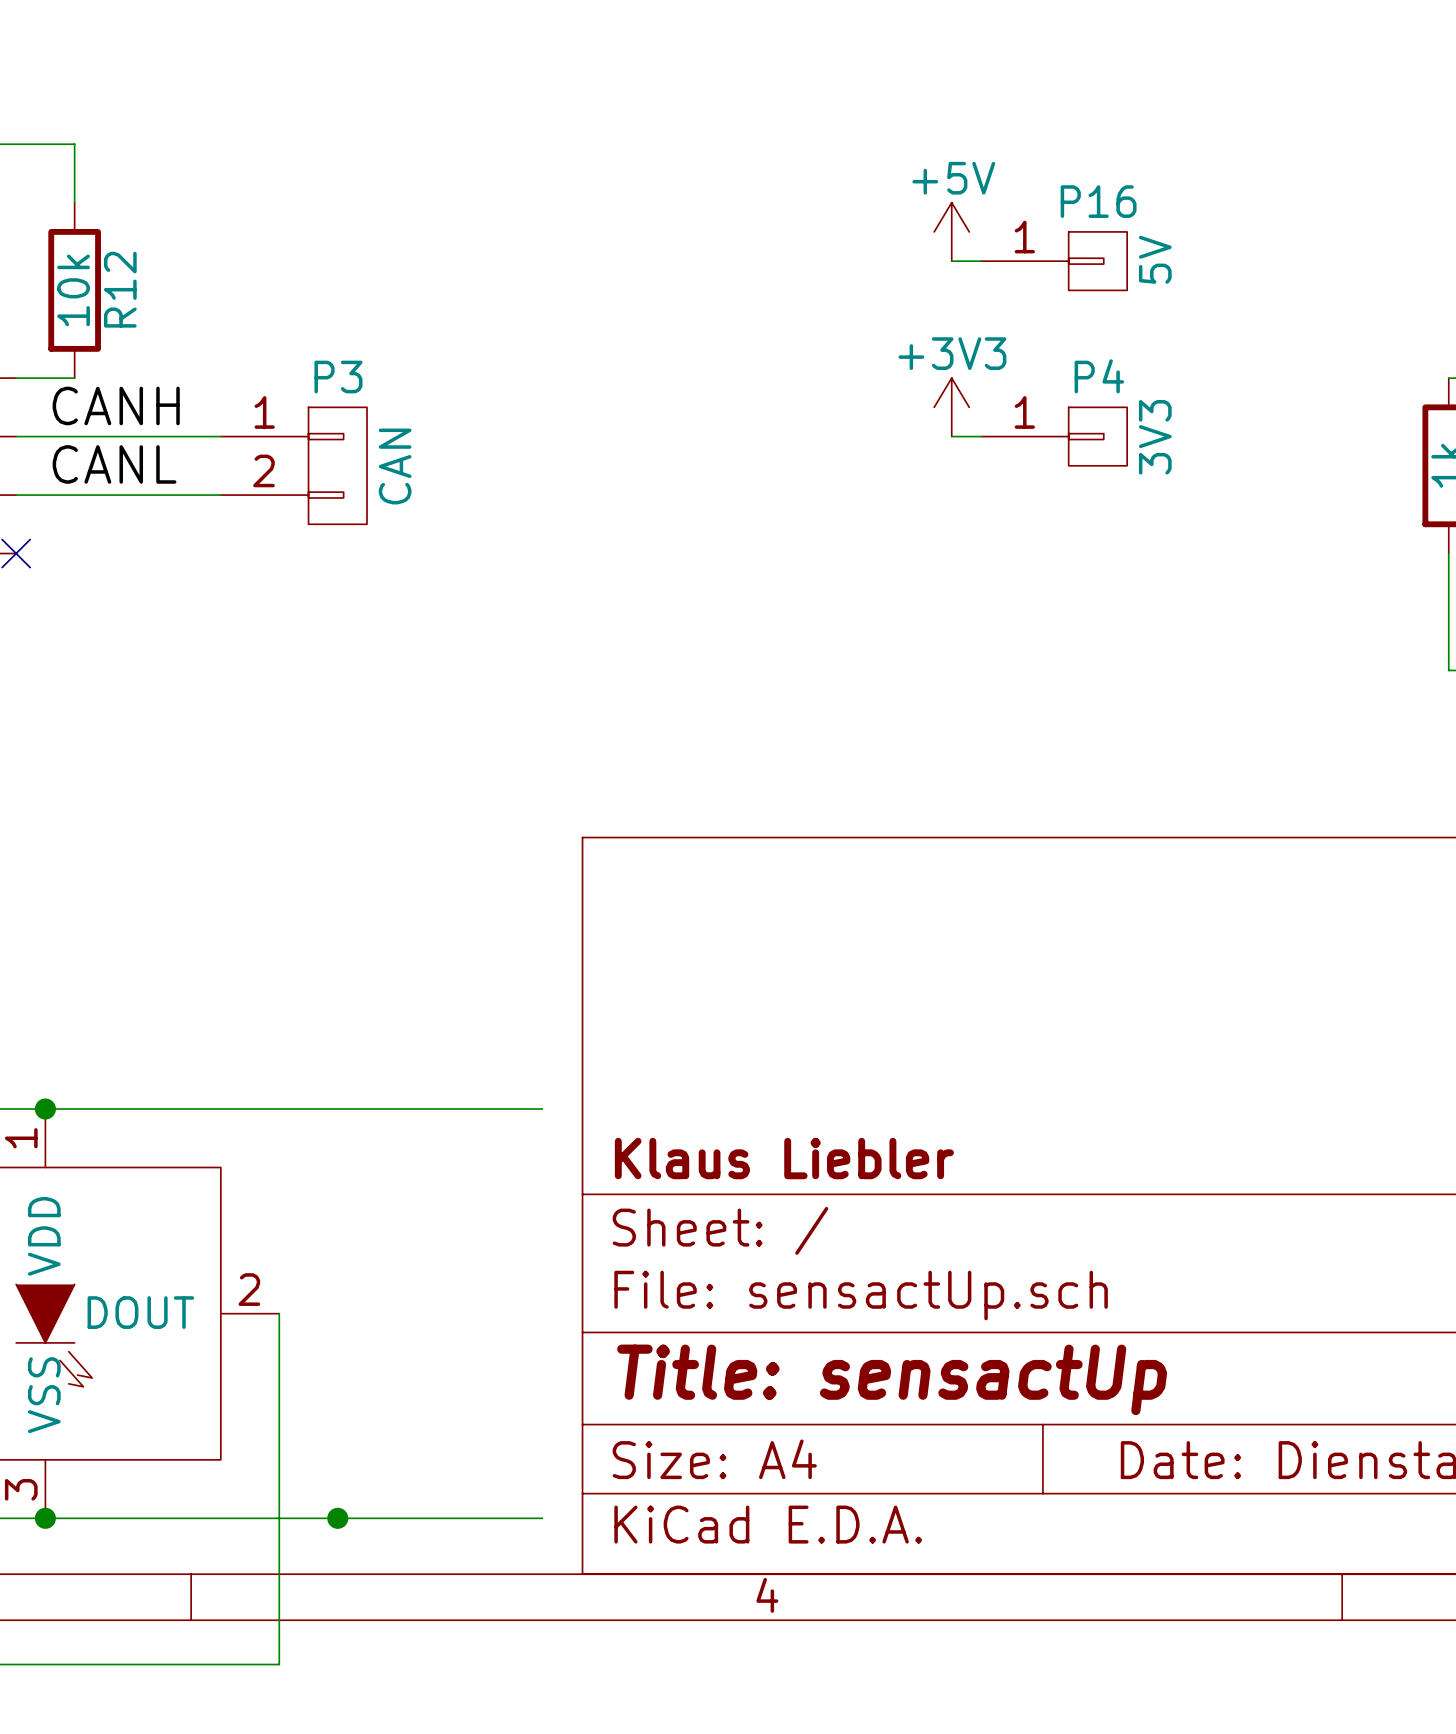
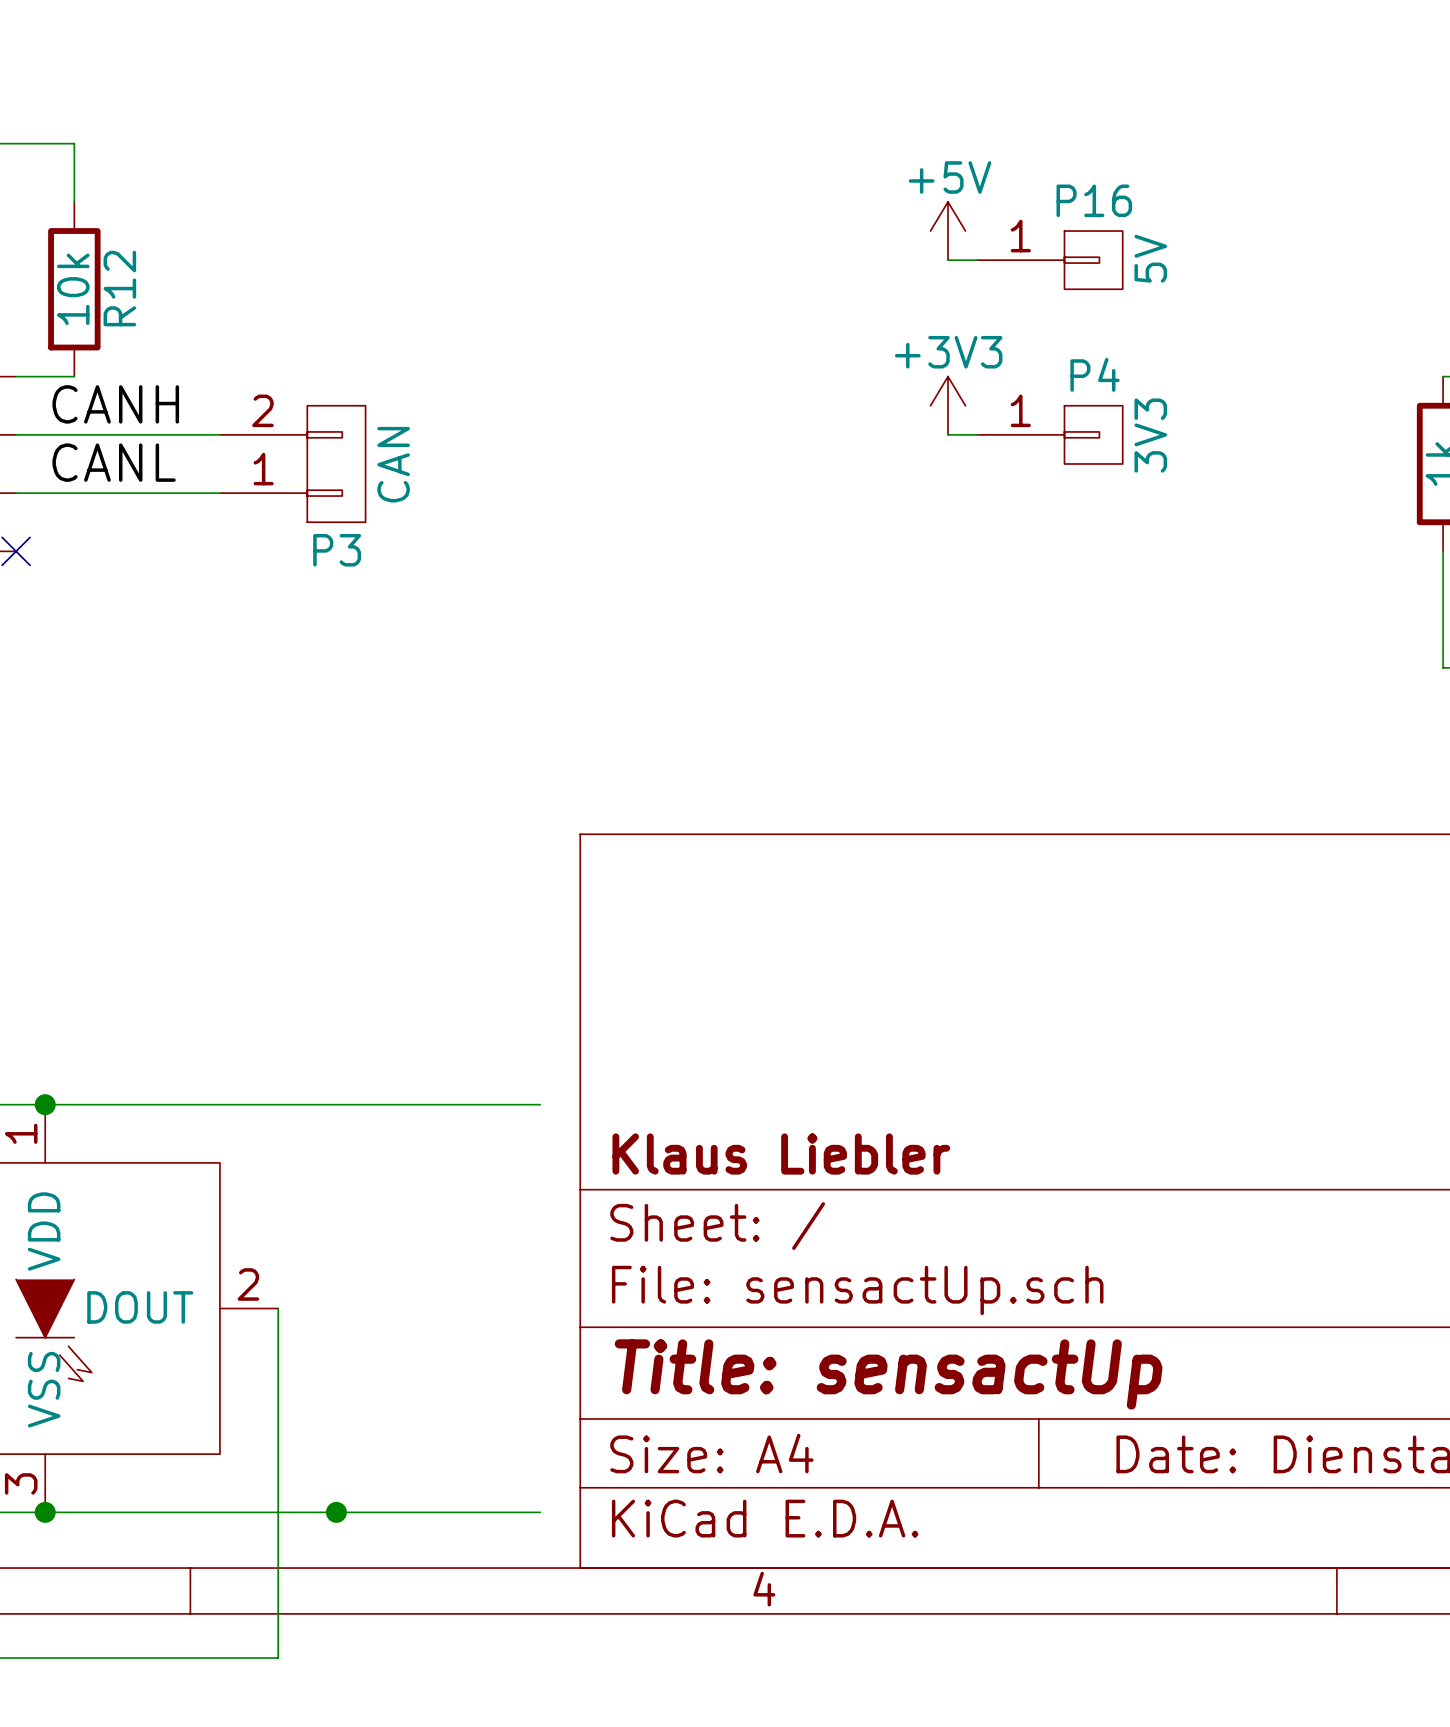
P3 flip: as is (337, 465) -> up-down (336, 463)

